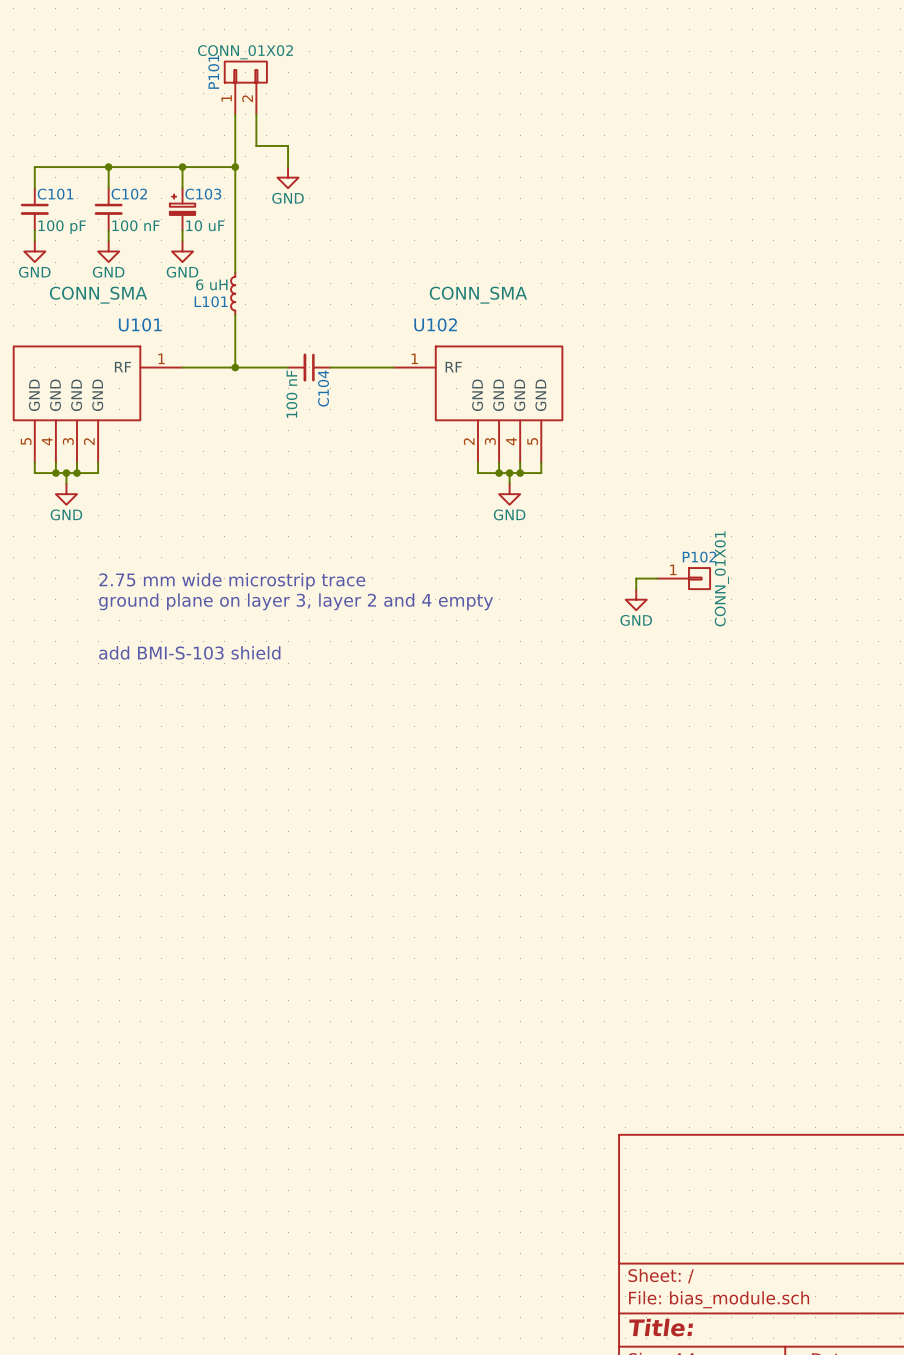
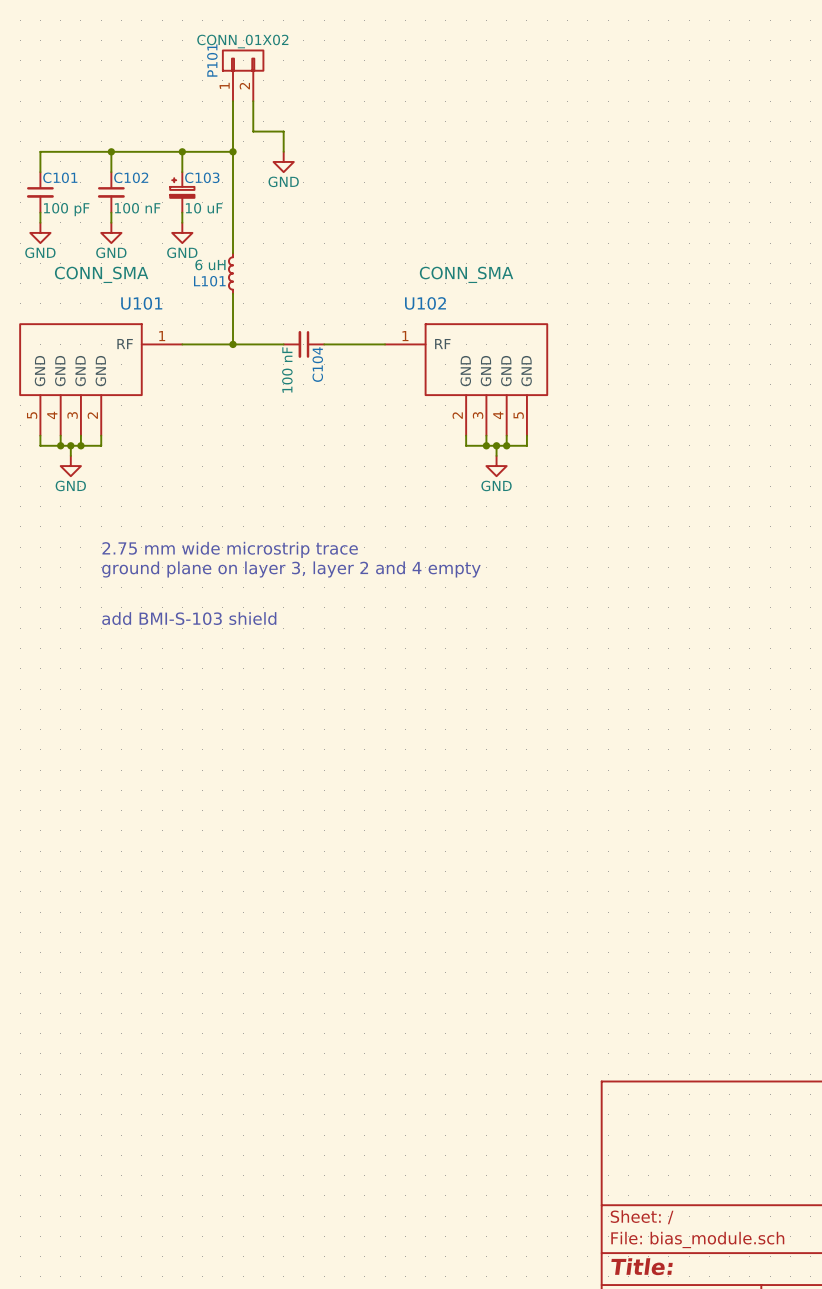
wire: (657, 578) (636, 578) (636, 589) -> none
P102: CONN_01X01 (683, 578) -> none
power symbol: GND (636, 599) -> none

